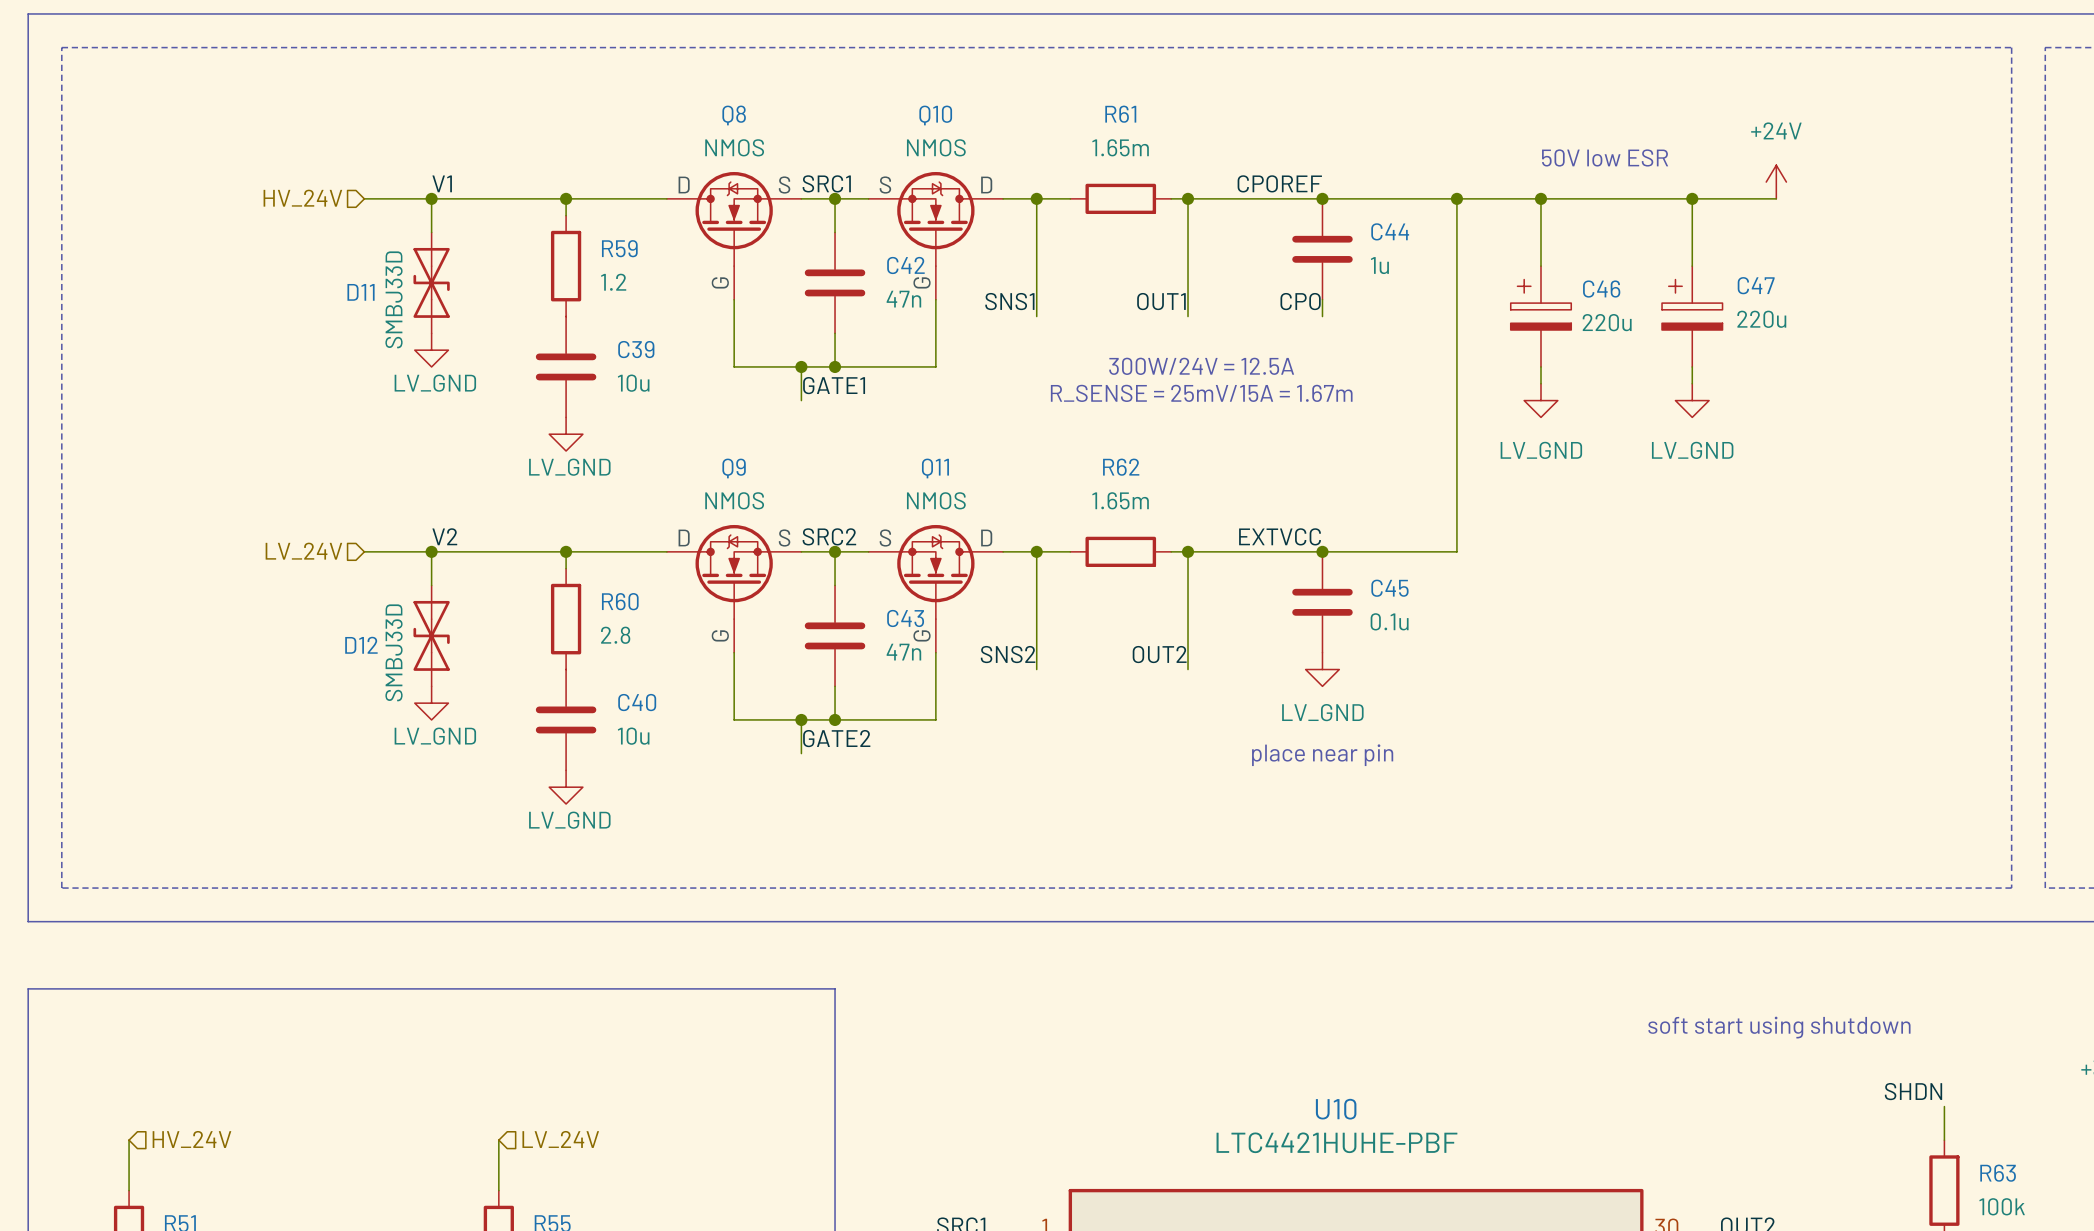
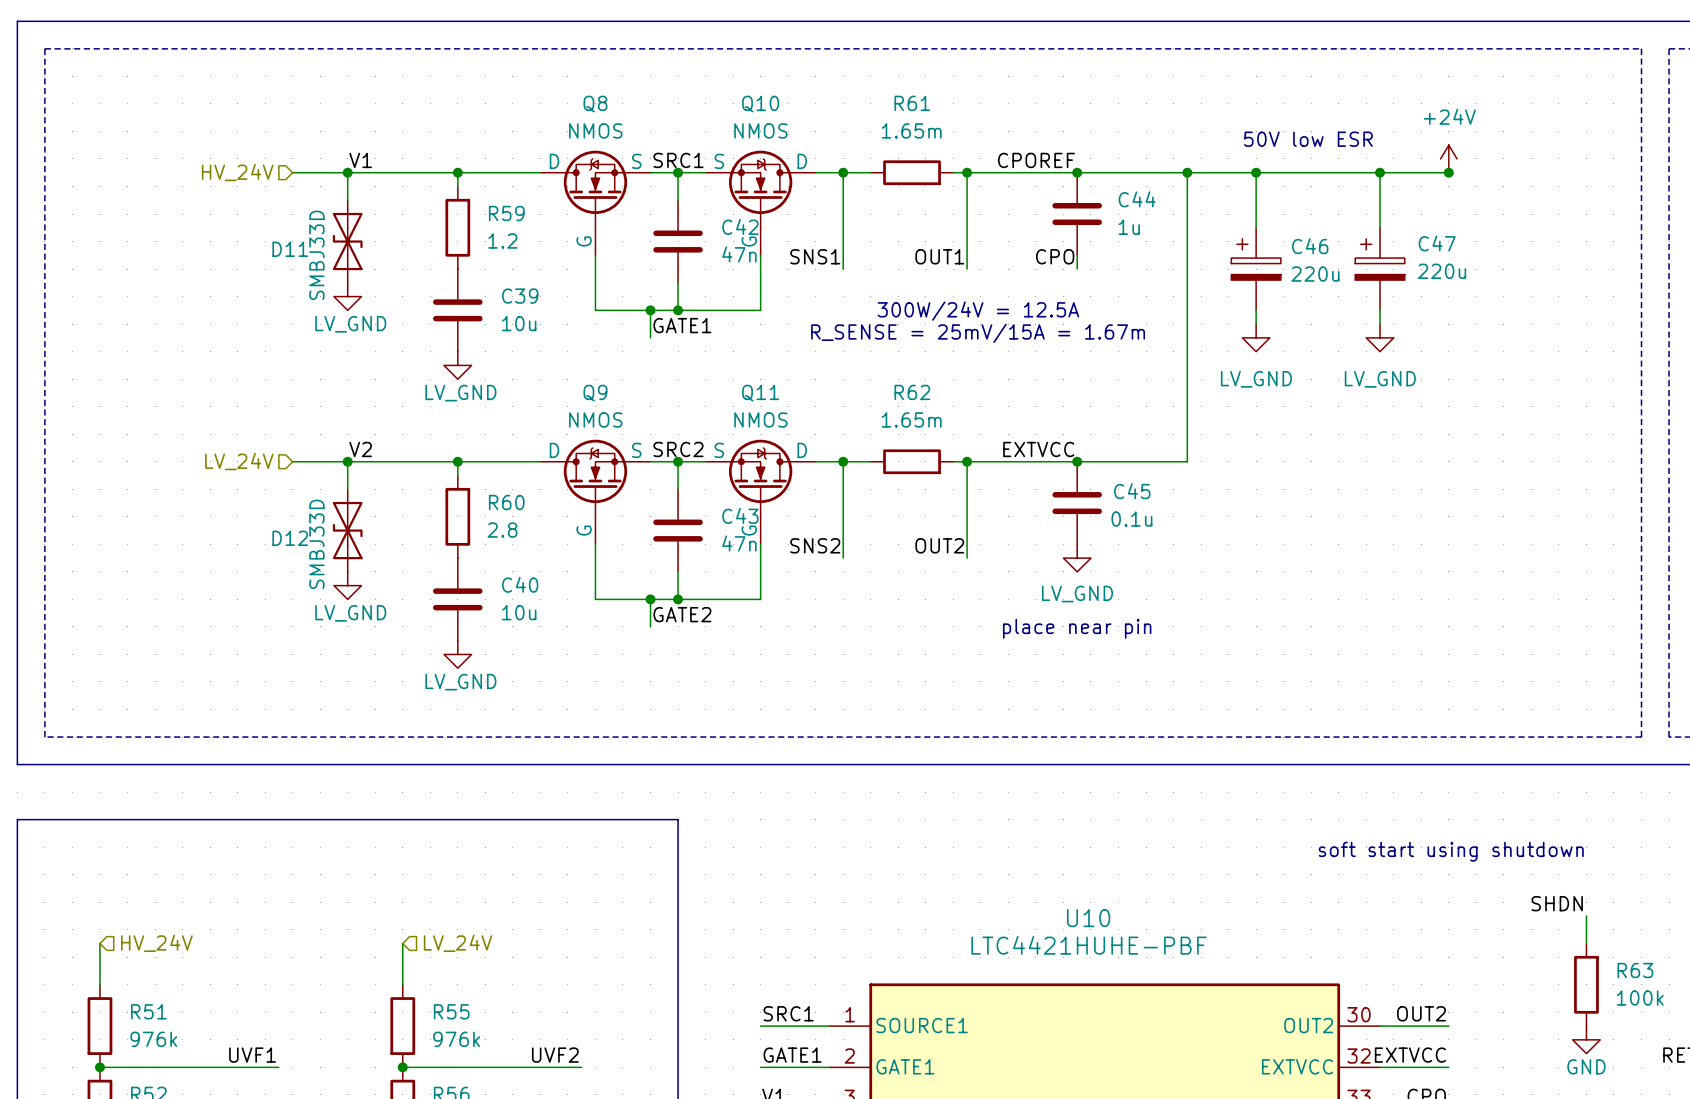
junction: none -> (1448, 172)

